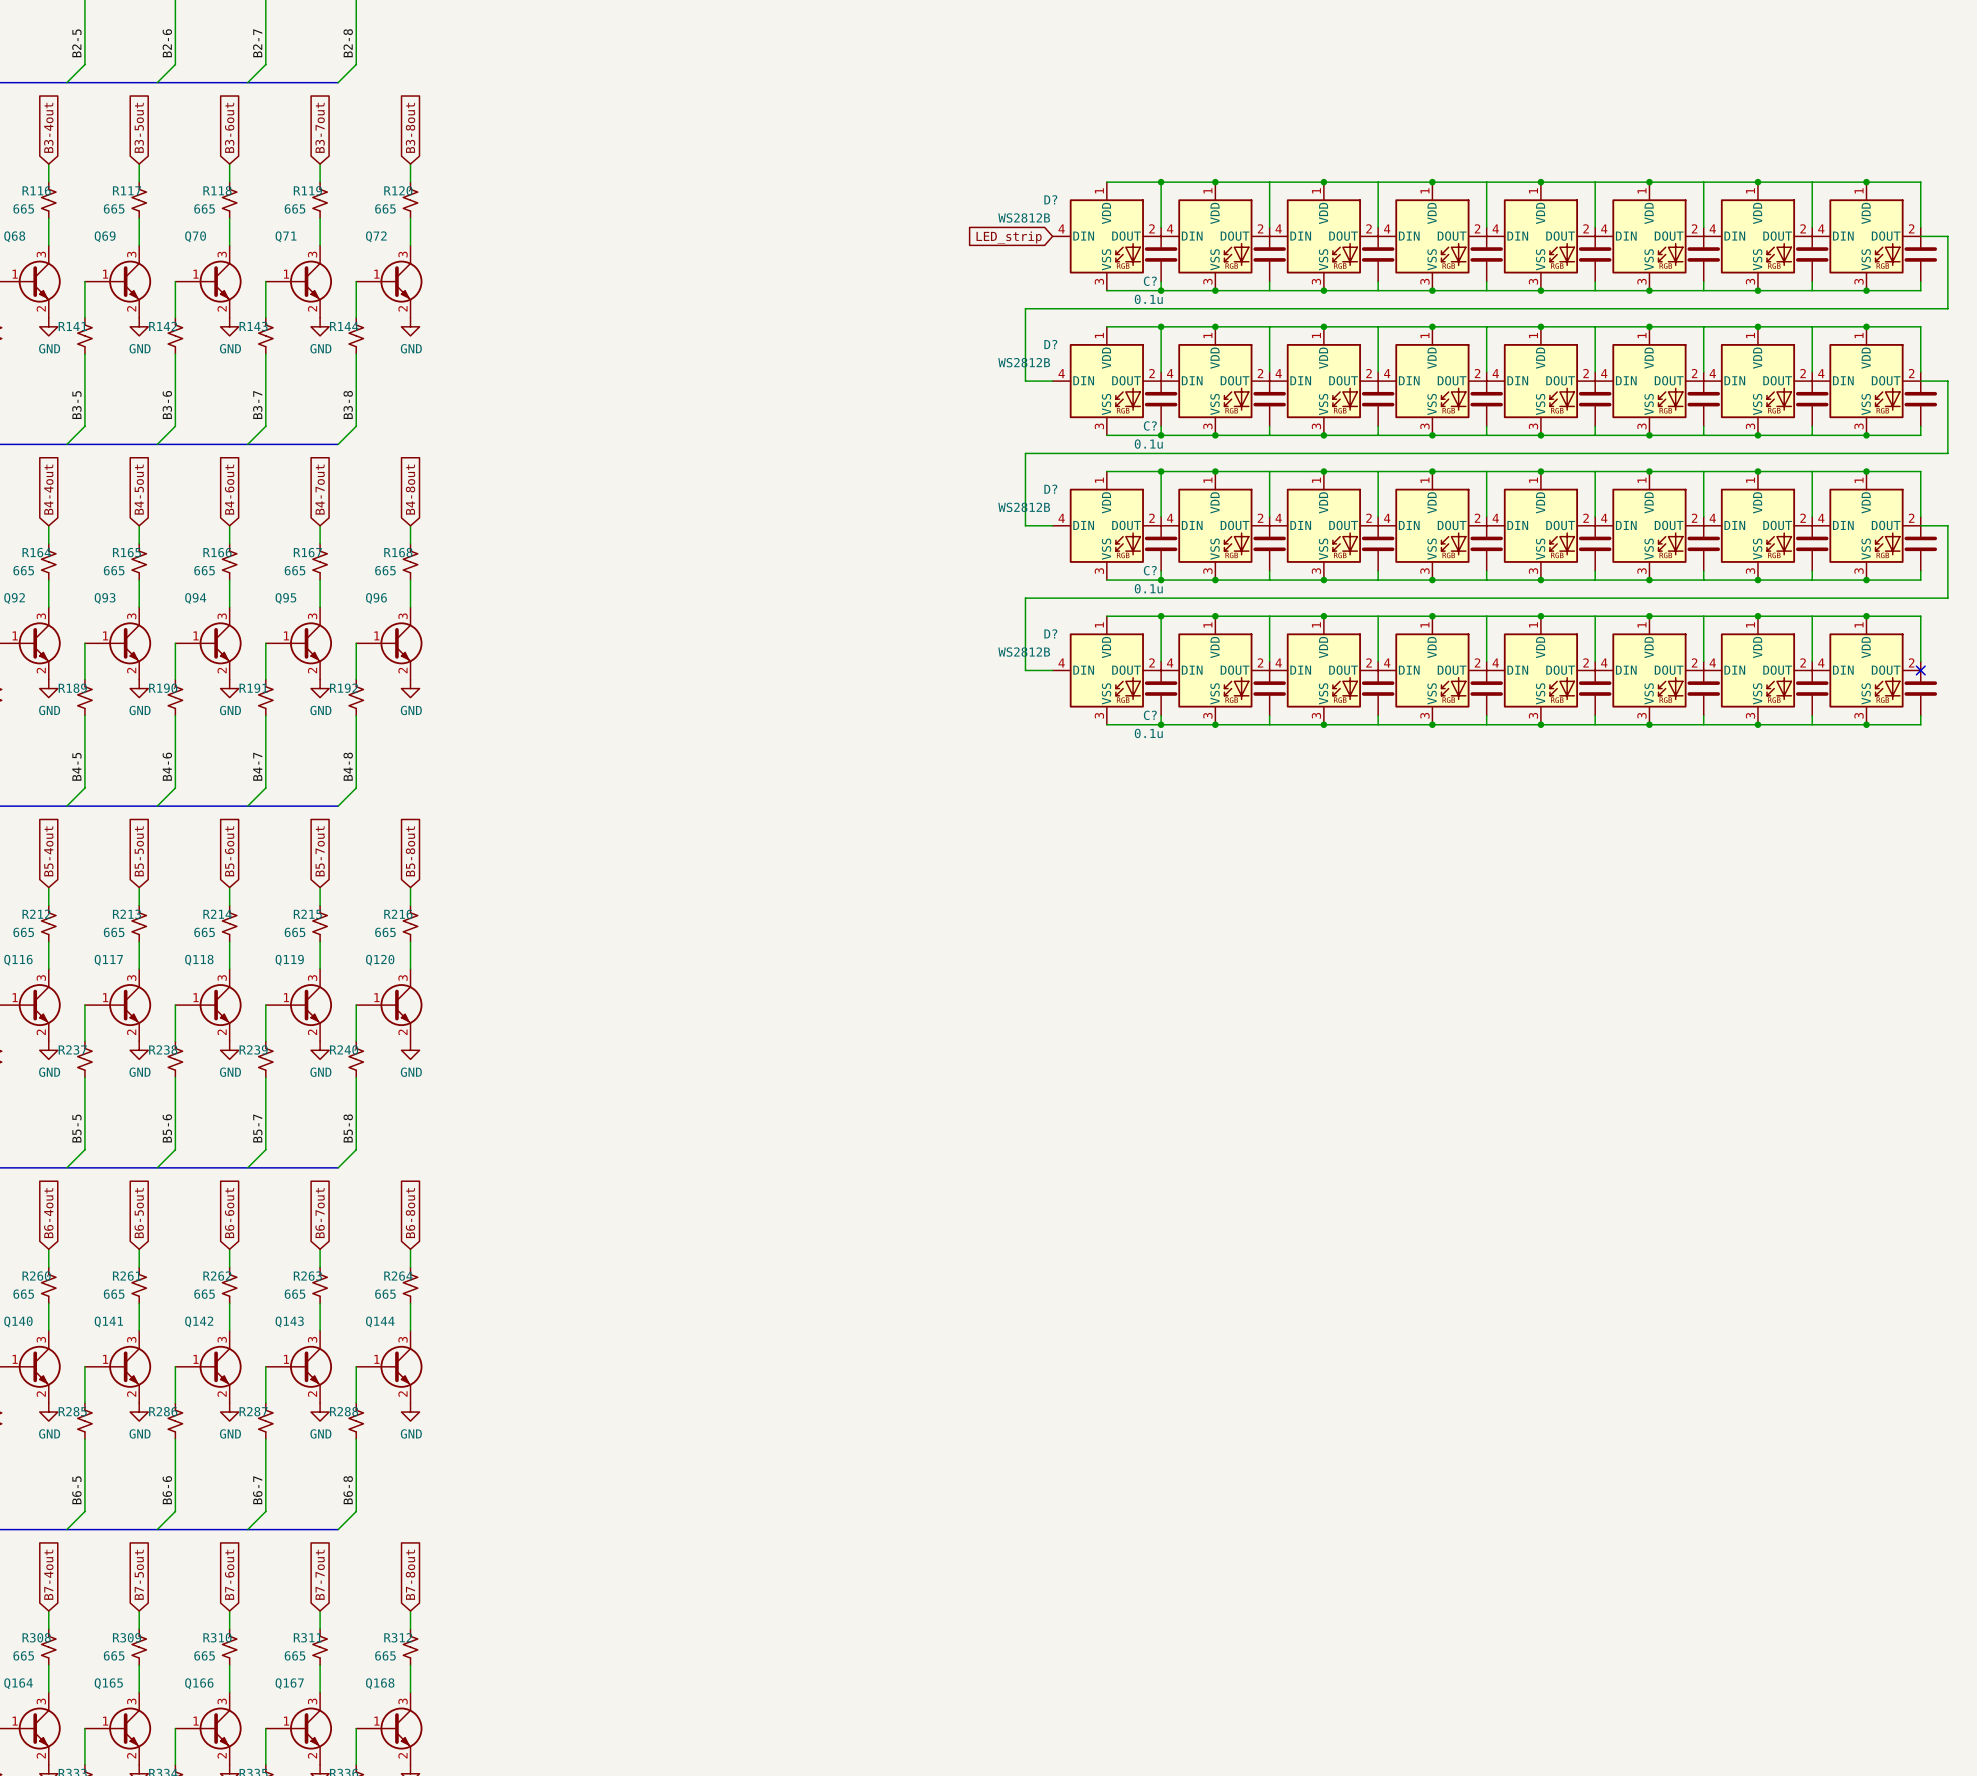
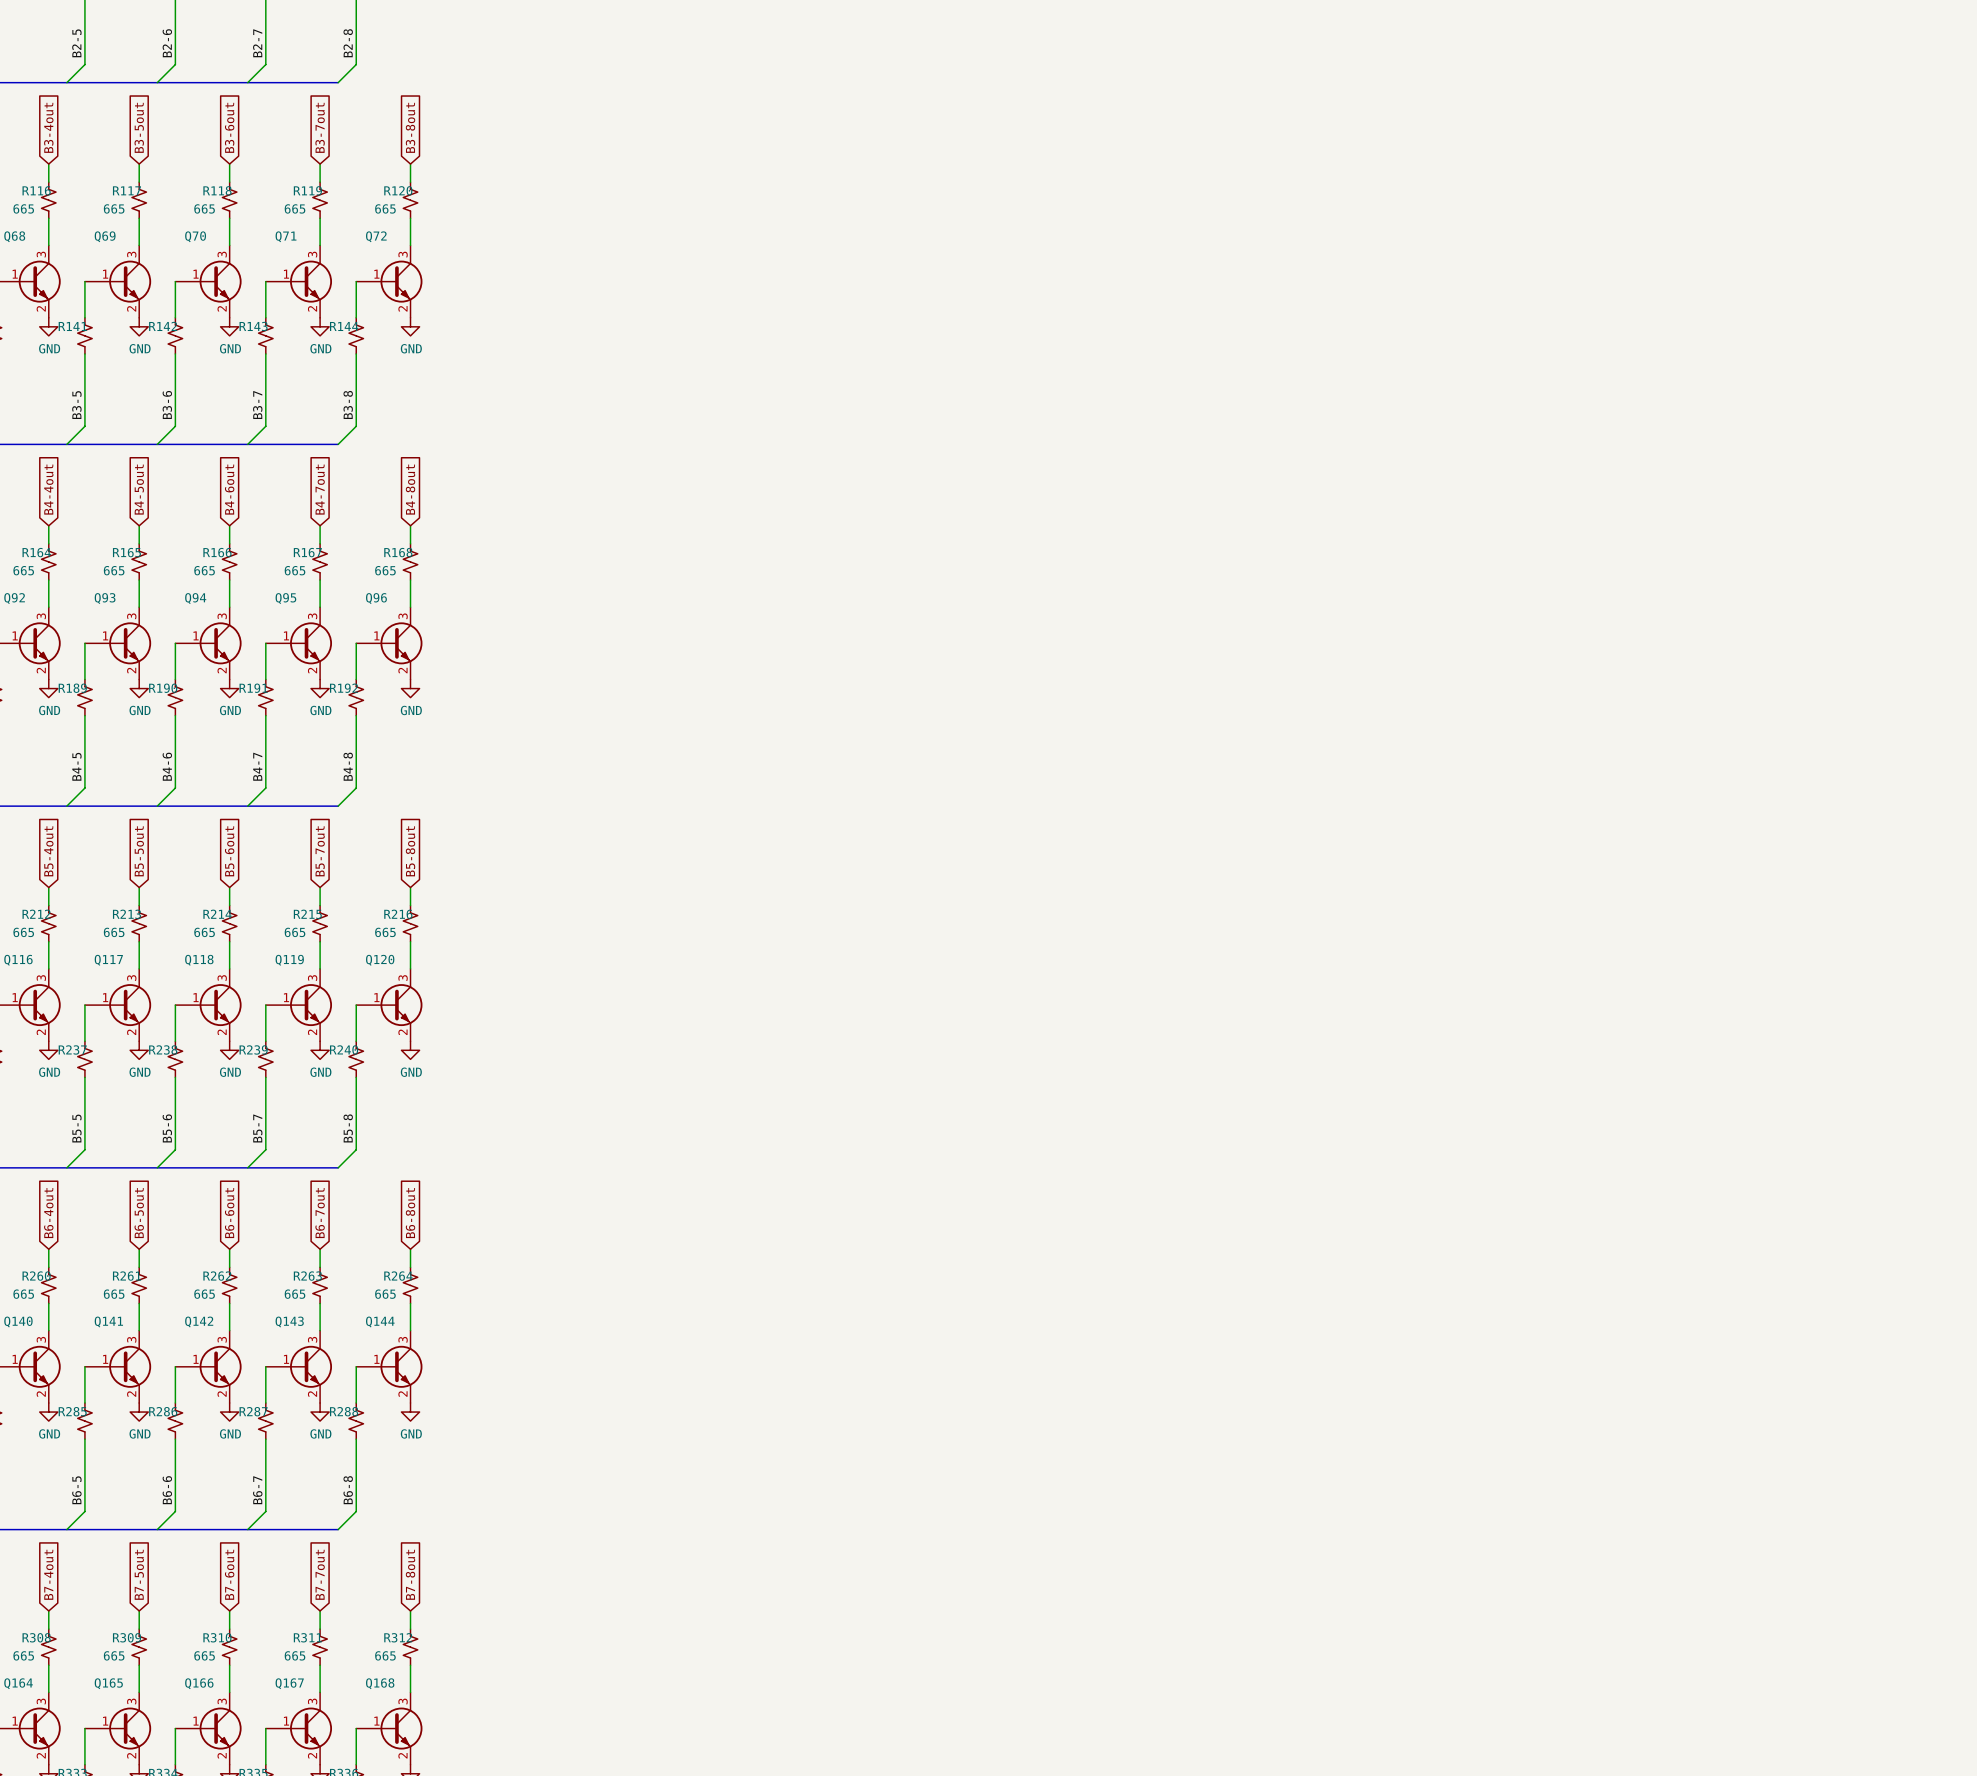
wire: (1106, 182) (1920, 182) (1920, 227) -> none
wire: (1161, 182) (1161, 227) -> none
junction: (1161, 182) -> none
junction: (1215, 182) -> none
wire: (1269, 182) (1269, 227) -> none
junction: (1323, 182) -> none
wire: (1378, 182) (1378, 227) -> none
junction: (1432, 182) -> none
wire: (1486, 182) (1486, 227) -> none
junction: (1540, 182) -> none
wire: (1595, 182) (1595, 227) -> none
junction: (1649, 182) -> none
wire: (1703, 182) (1703, 227) -> none
junction: (1757, 182) -> none
wire: (1812, 182) (1812, 227) -> none
junction: (1866, 182) -> none
D?: WS2812B (1106, 236) -> none
part: (1215, 236) -> none
part: (1323, 236) -> none
part: (1432, 236) -> none
part: (1540, 236) -> none
part: (1649, 236) -> none
part: (1757, 236) -> none
part: (1866, 236) -> none
wire: (1920, 236) (1947, 236) (1947, 308) (1025, 308) (1025, 381) (1052, 381) -> none
global label: LED_strip (1009, 237) -> none
C?: 0.1u (1161, 254) -> none
part: (1269, 254) -> none
part: (1378, 254) -> none
part: (1486, 254) -> none
part: (1595, 254) -> none
part: (1703, 254) -> none
part: (1812, 254) -> none
part: (1920, 254) -> none
wire: (1161, 281) (1161, 290) -> none
wire: (1269, 281) (1269, 290) -> none
wire: (1378, 281) (1378, 290) -> none
wire: (1486, 281) (1486, 290) -> none
wire: (1595, 281) (1595, 290) -> none
wire: (1703, 281) (1703, 290) -> none
wire: (1812, 281) (1812, 290) -> none
wire: (1920, 281) (1920, 290) (1106, 290) -> none
junction: (1161, 290) -> none
junction: (1215, 290) -> none
junction: (1323, 290) -> none
junction: (1432, 290) -> none
junction: (1540, 290) -> none
junction: (1649, 290) -> none
junction: (1757, 290) -> none
junction: (1866, 290) -> none
wire: (1106, 326) (1920, 326) (1920, 372) -> none
wire: (1161, 326) (1161, 372) -> none
junction: (1161, 326) -> none
junction: (1215, 326) -> none
wire: (1269, 326) (1269, 372) -> none
junction: (1323, 326) -> none
wire: (1378, 326) (1378, 372) -> none
junction: (1432, 326) -> none
wire: (1486, 326) (1486, 372) -> none
junction: (1540, 326) -> none
wire: (1595, 326) (1595, 372) -> none
junction: (1649, 326) -> none
wire: (1703, 326) (1703, 372) -> none
junction: (1757, 326) -> none
wire: (1812, 326) (1812, 372) -> none
junction: (1866, 326) -> none
D?: WS2812B (1106, 381) -> none
part: (1215, 381) -> none
part: (1323, 381) -> none
part: (1432, 381) -> none
part: (1540, 381) -> none
part: (1649, 381) -> none
part: (1757, 381) -> none
part: (1866, 381) -> none
wire: (1920, 381) (1947, 381) (1947, 453) (1025, 453) (1025, 525) (1052, 525) -> none
C?: 0.1u (1161, 399) -> none
part: (1269, 399) -> none
part: (1378, 399) -> none
part: (1486, 399) -> none
part: (1595, 399) -> none
part: (1703, 399) -> none
part: (1812, 399) -> none
part: (1920, 399) -> none
wire: (1161, 426) (1161, 435) -> none
wire: (1269, 426) (1269, 435) -> none
wire: (1378, 426) (1378, 435) -> none
wire: (1486, 426) (1486, 435) -> none
wire: (1595, 426) (1595, 435) -> none
wire: (1703, 426) (1703, 435) -> none
wire: (1812, 426) (1812, 435) -> none
wire: (1920, 426) (1920, 435) (1106, 435) -> none
junction: (1161, 435) -> none
junction: (1215, 435) -> none
junction: (1323, 435) -> none
junction: (1432, 435) -> none
junction: (1540, 435) -> none
junction: (1649, 435) -> none
junction: (1757, 435) -> none
junction: (1866, 435) -> none
wire: (1106, 471) (1920, 471) (1920, 516) -> none
wire: (1161, 471) (1161, 516) -> none
junction: (1161, 471) -> none
junction: (1215, 471) -> none
wire: (1269, 471) (1269, 516) -> none
junction: (1323, 471) -> none
wire: (1378, 471) (1378, 516) -> none
junction: (1432, 471) -> none
wire: (1486, 471) (1486, 516) -> none
junction: (1540, 471) -> none
wire: (1595, 471) (1595, 516) -> none
junction: (1649, 471) -> none
wire: (1703, 471) (1703, 516) -> none
junction: (1757, 471) -> none
wire: (1812, 471) (1812, 516) -> none
junction: (1866, 471) -> none
D?: WS2812B (1106, 525) -> none
part: (1215, 525) -> none
part: (1323, 525) -> none
part: (1432, 525) -> none
part: (1540, 525) -> none
part: (1649, 525) -> none
part: (1757, 525) -> none
part: (1866, 525) -> none
wire: (1920, 525) (1947, 525) (1947, 598) (1025, 598) (1025, 670) (1052, 670) -> none
C?: 0.1u (1161, 543) -> none
part: (1269, 543) -> none
part: (1378, 543) -> none
part: (1486, 543) -> none
part: (1595, 543) -> none
part: (1703, 543) -> none
part: (1812, 543) -> none
part: (1920, 543) -> none
wire: (1161, 571) (1161, 580) -> none
wire: (1269, 571) (1269, 580) -> none
wire: (1378, 571) (1378, 580) -> none
wire: (1486, 571) (1486, 580) -> none
wire: (1595, 571) (1595, 580) -> none
wire: (1703, 571) (1703, 580) -> none
wire: (1812, 571) (1812, 580) -> none
wire: (1920, 571) (1920, 580) (1106, 580) -> none
junction: (1161, 580) -> none
junction: (1215, 580) -> none
junction: (1323, 580) -> none
junction: (1432, 580) -> none
junction: (1540, 580) -> none
junction: (1649, 580) -> none
junction: (1757, 580) -> none
junction: (1866, 580) -> none
wire: (1106, 616) (1920, 616) (1920, 661) -> none
wire: (1161, 616) (1161, 661) -> none
junction: (1161, 616) -> none
junction: (1215, 616) -> none
wire: (1269, 616) (1269, 661) -> none
junction: (1323, 616) -> none
wire: (1378, 616) (1378, 661) -> none
junction: (1432, 616) -> none
wire: (1486, 616) (1486, 661) -> none
junction: (1540, 616) -> none
wire: (1595, 616) (1595, 661) -> none
junction: (1649, 616) -> none
wire: (1703, 616) (1703, 661) -> none
junction: (1757, 616) -> none
wire: (1812, 616) (1812, 661) -> none
junction: (1866, 616) -> none
D?: WS2812B (1106, 670) -> none
part: (1215, 670) -> none
part: (1323, 670) -> none
part: (1432, 670) -> none
part: (1540, 670) -> none
part: (1649, 670) -> none
part: (1757, 670) -> none
part: (1866, 670) -> none
no-connect mark: (1920, 670) -> none
C?: 0.1u (1161, 688) -> none
part: (1269, 688) -> none
part: (1378, 688) -> none
part: (1486, 688) -> none
part: (1595, 688) -> none
part: (1703, 688) -> none
part: (1812, 688) -> none
part: (1920, 688) -> none
wire: (1161, 715) (1161, 724) -> none
wire: (1269, 715) (1269, 724) -> none
wire: (1378, 715) (1378, 724) -> none
wire: (1486, 715) (1486, 724) -> none
wire: (1595, 715) (1595, 724) -> none
wire: (1703, 715) (1703, 724) -> none
wire: (1812, 715) (1812, 724) -> none
wire: (1920, 715) (1920, 724) (1106, 724) -> none
junction: (1161, 724) -> none
junction: (1215, 724) -> none
junction: (1323, 724) -> none
junction: (1432, 724) -> none
junction: (1540, 724) -> none
junction: (1649, 724) -> none
junction: (1757, 724) -> none
junction: (1866, 724) -> none

